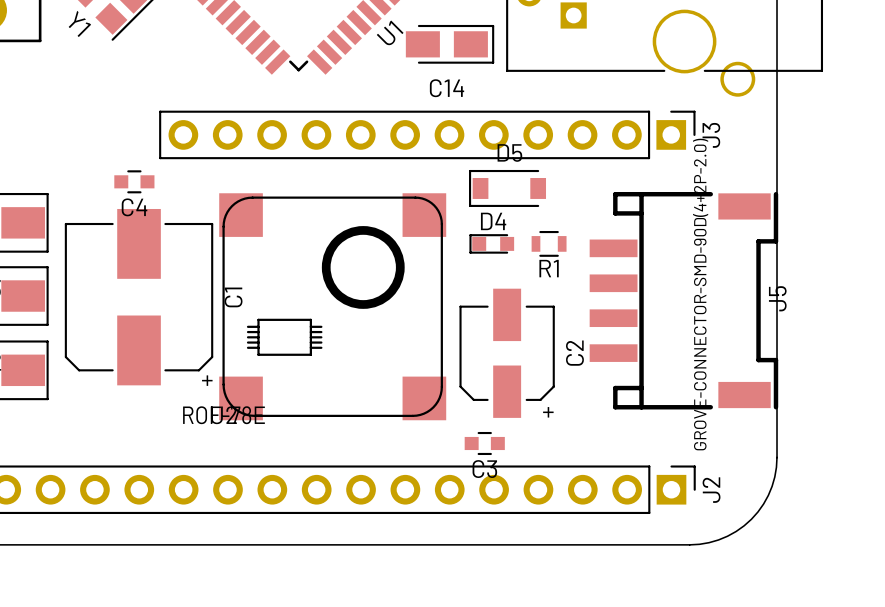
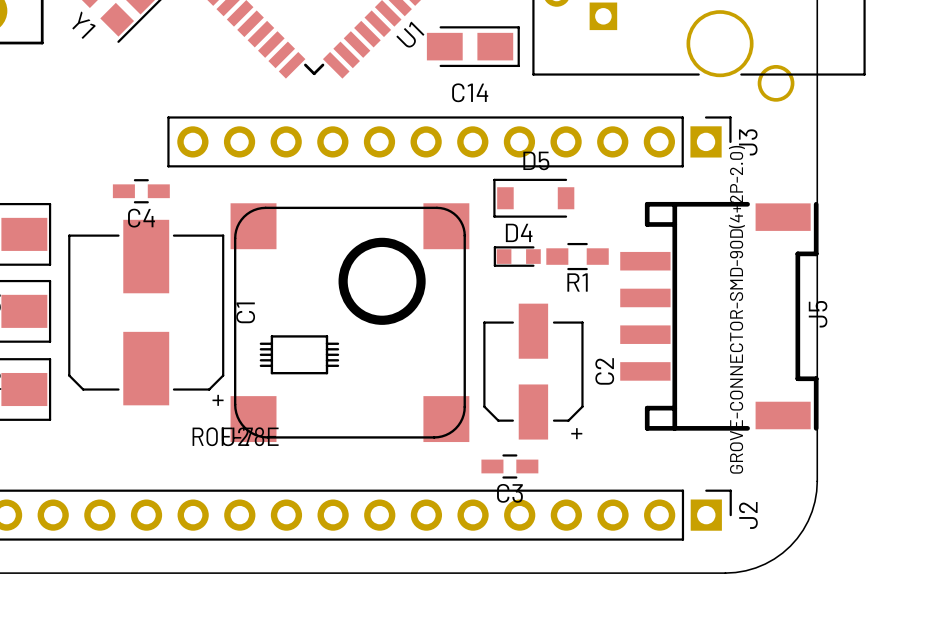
C4 footprint: [114, 170, 155, 194] -> [112, 179, 170, 204]
R1 footprint: [531, 230, 567, 257] -> [546, 242, 609, 271]
C3 footprint: [464, 431, 505, 456] -> [481, 454, 539, 479]

